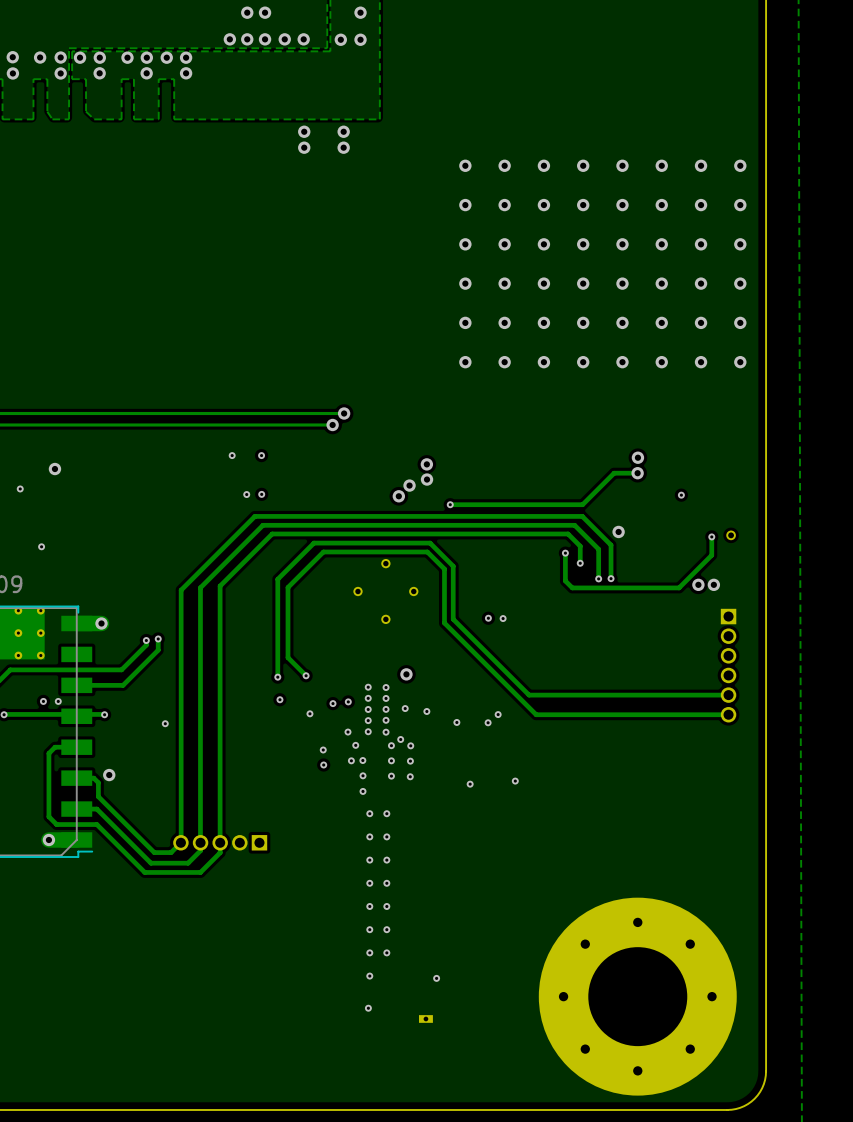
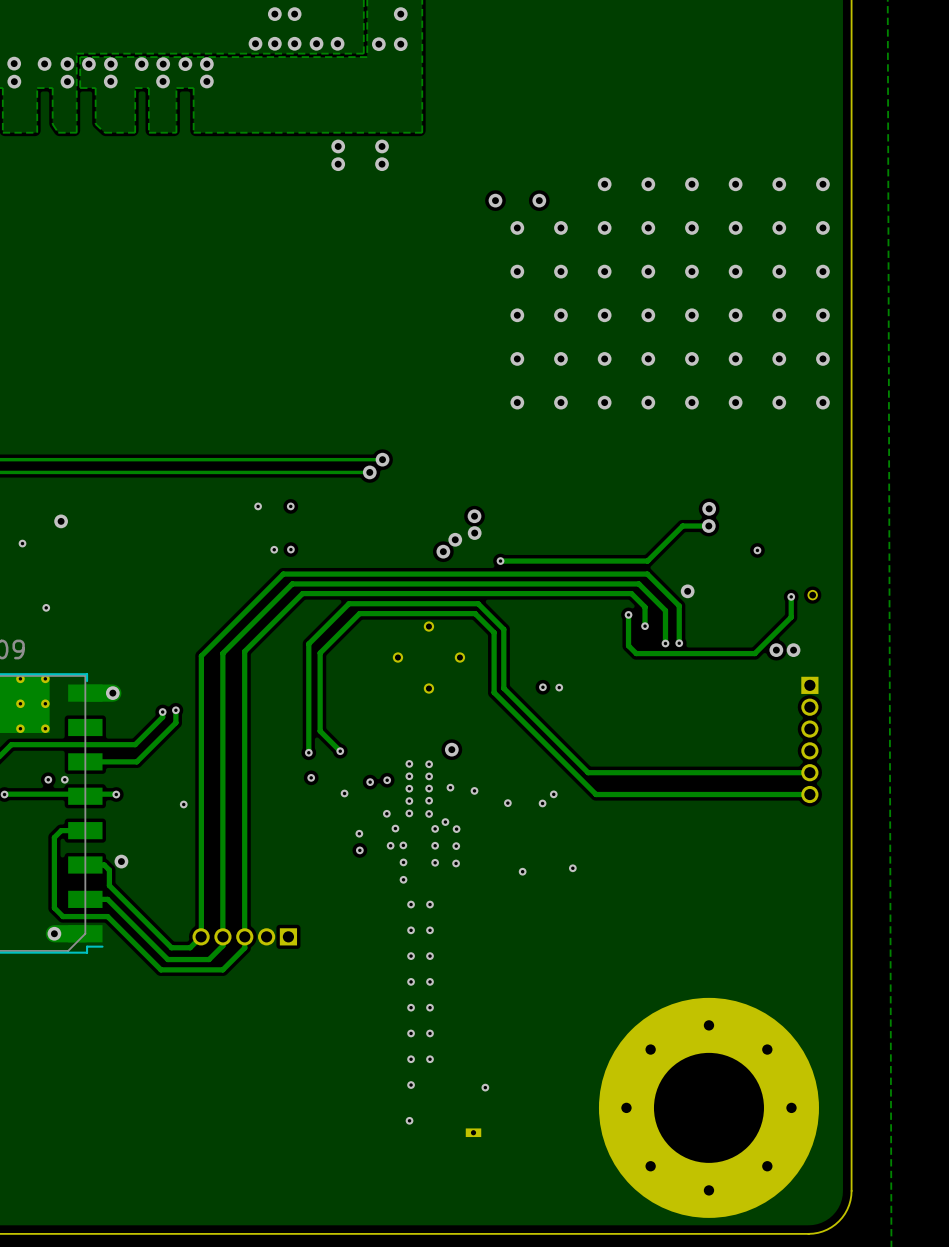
via: (465, 165) -> none
via: (504, 165) -> none
via: none -> (495, 200)
via: none -> (539, 200)

